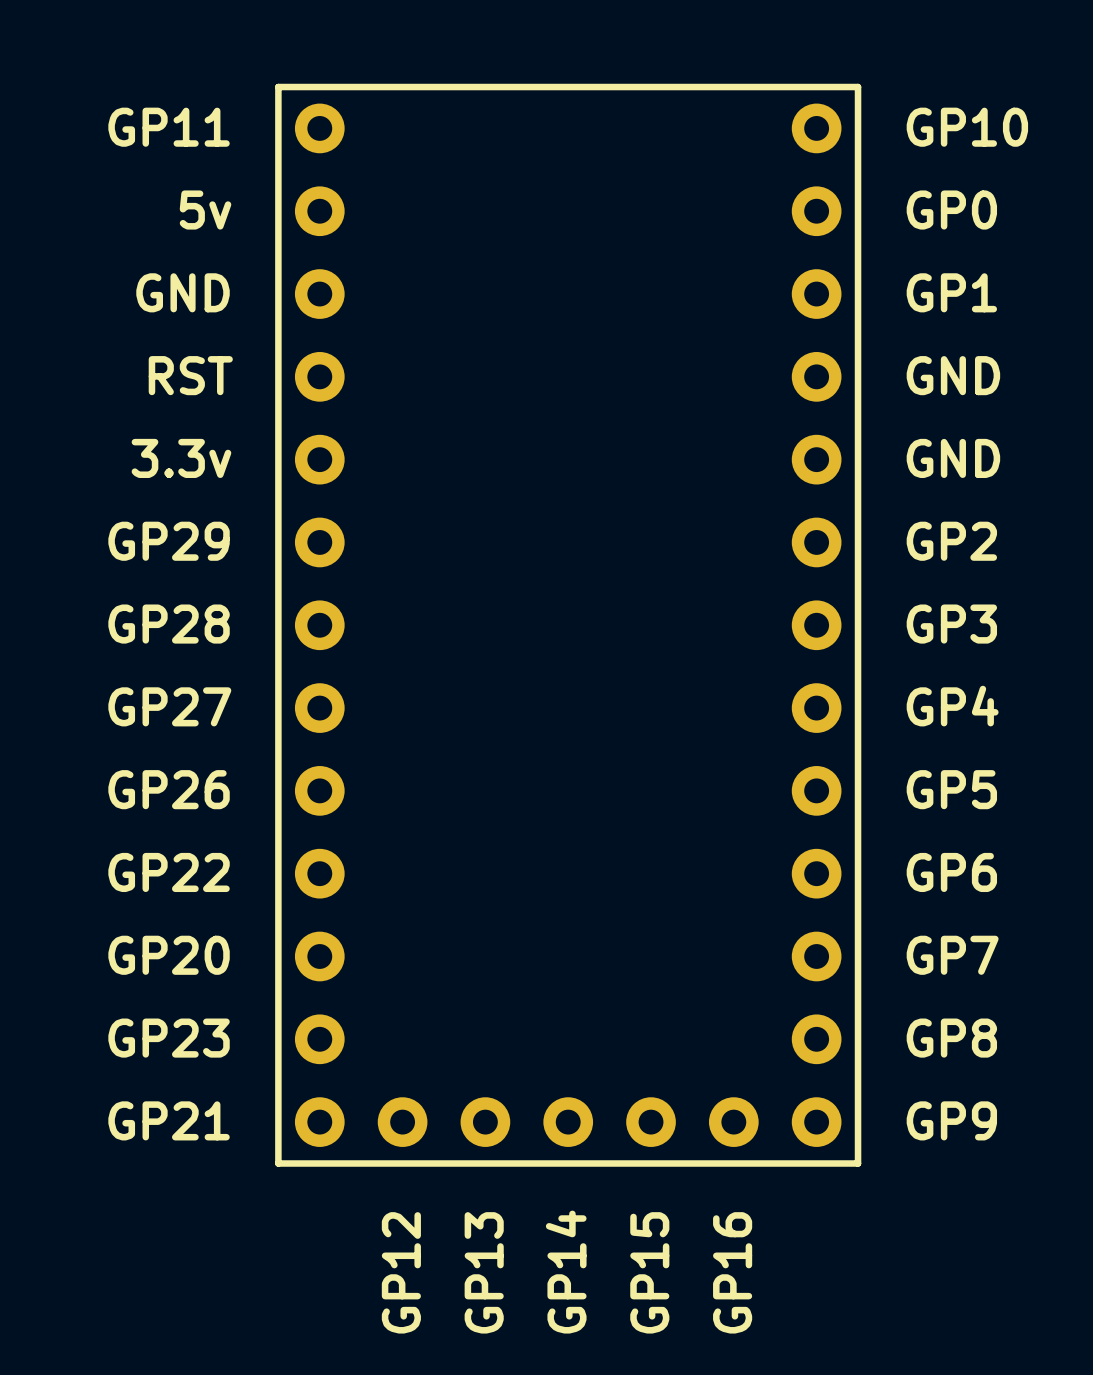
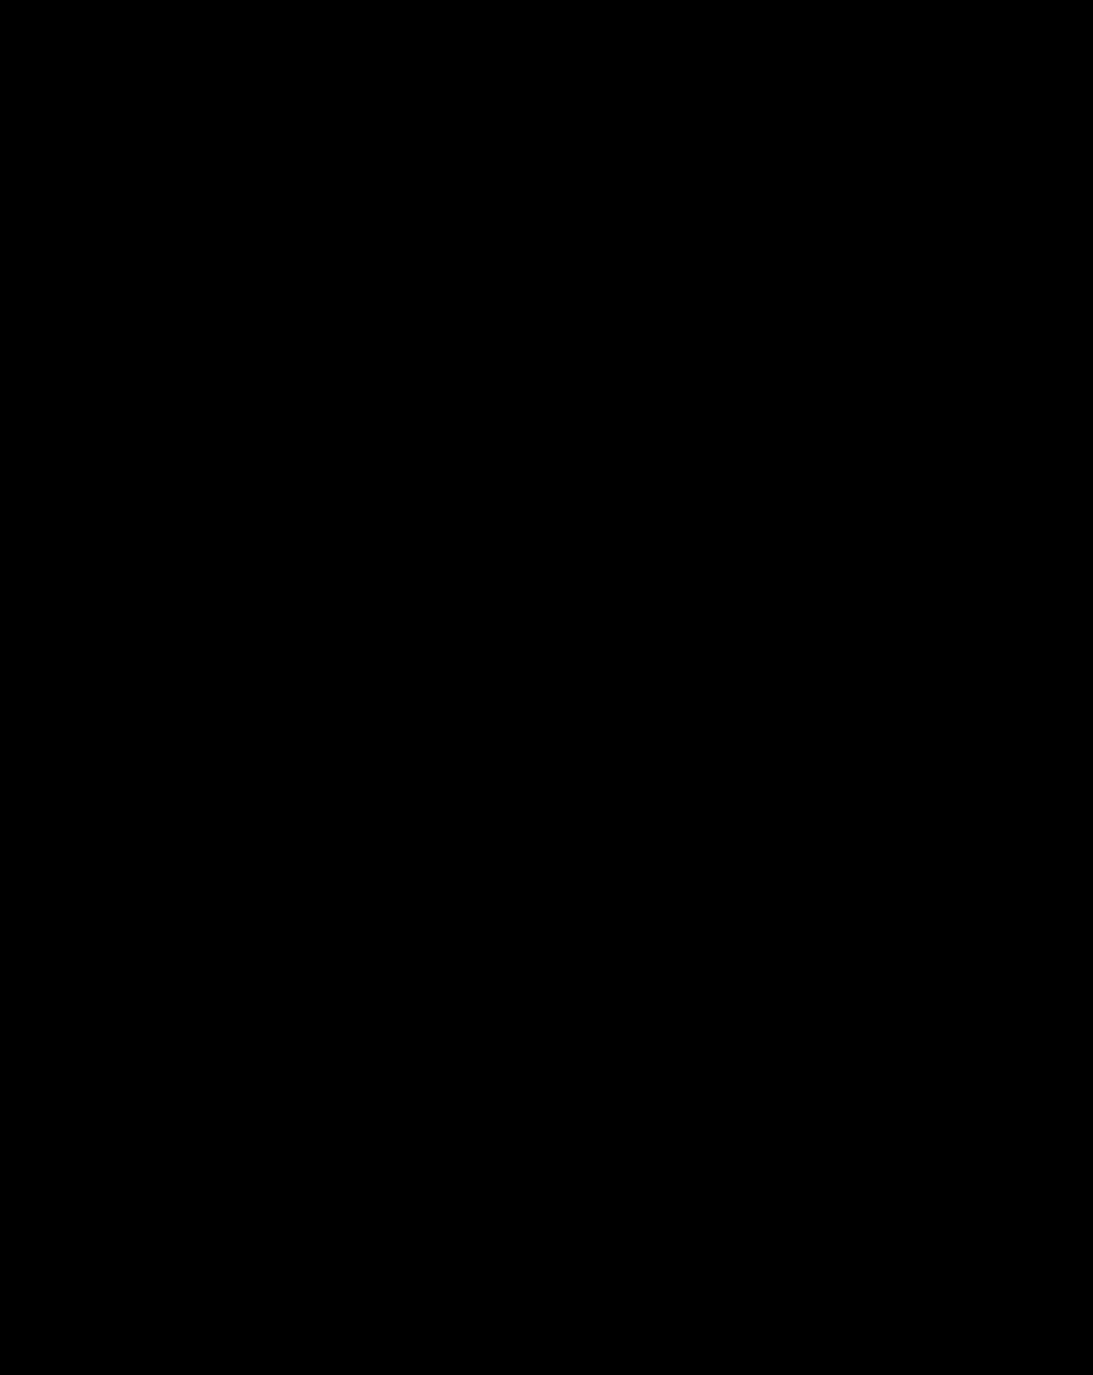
part: (568, 625) -> none

